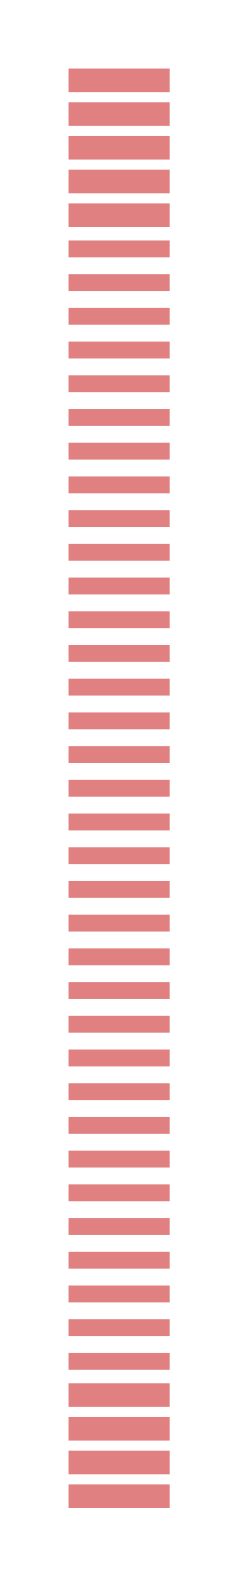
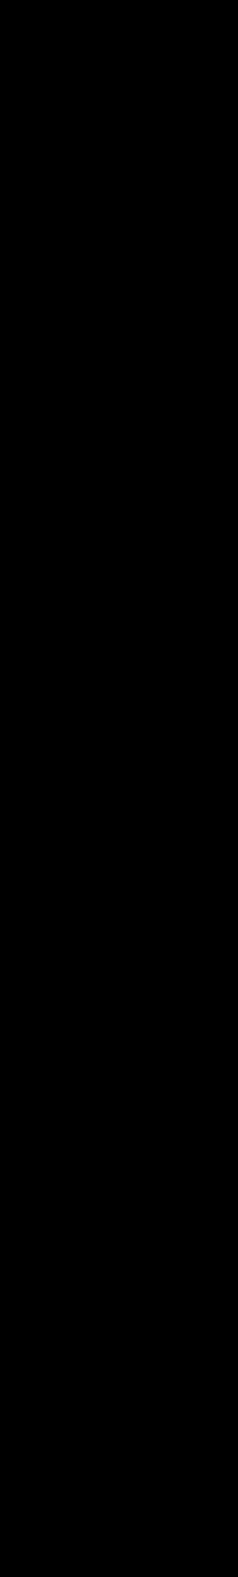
part: (119, 788) -> none

